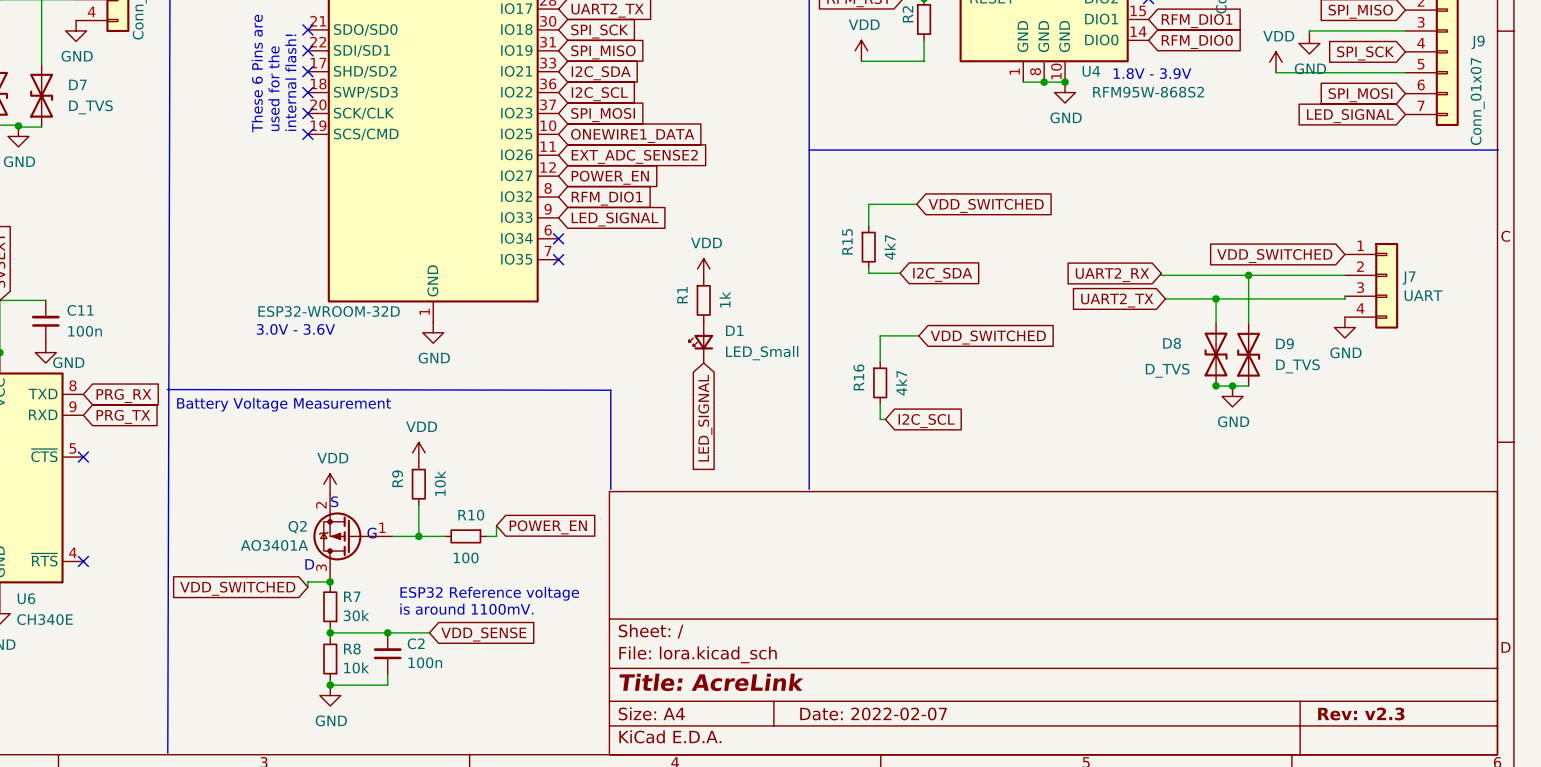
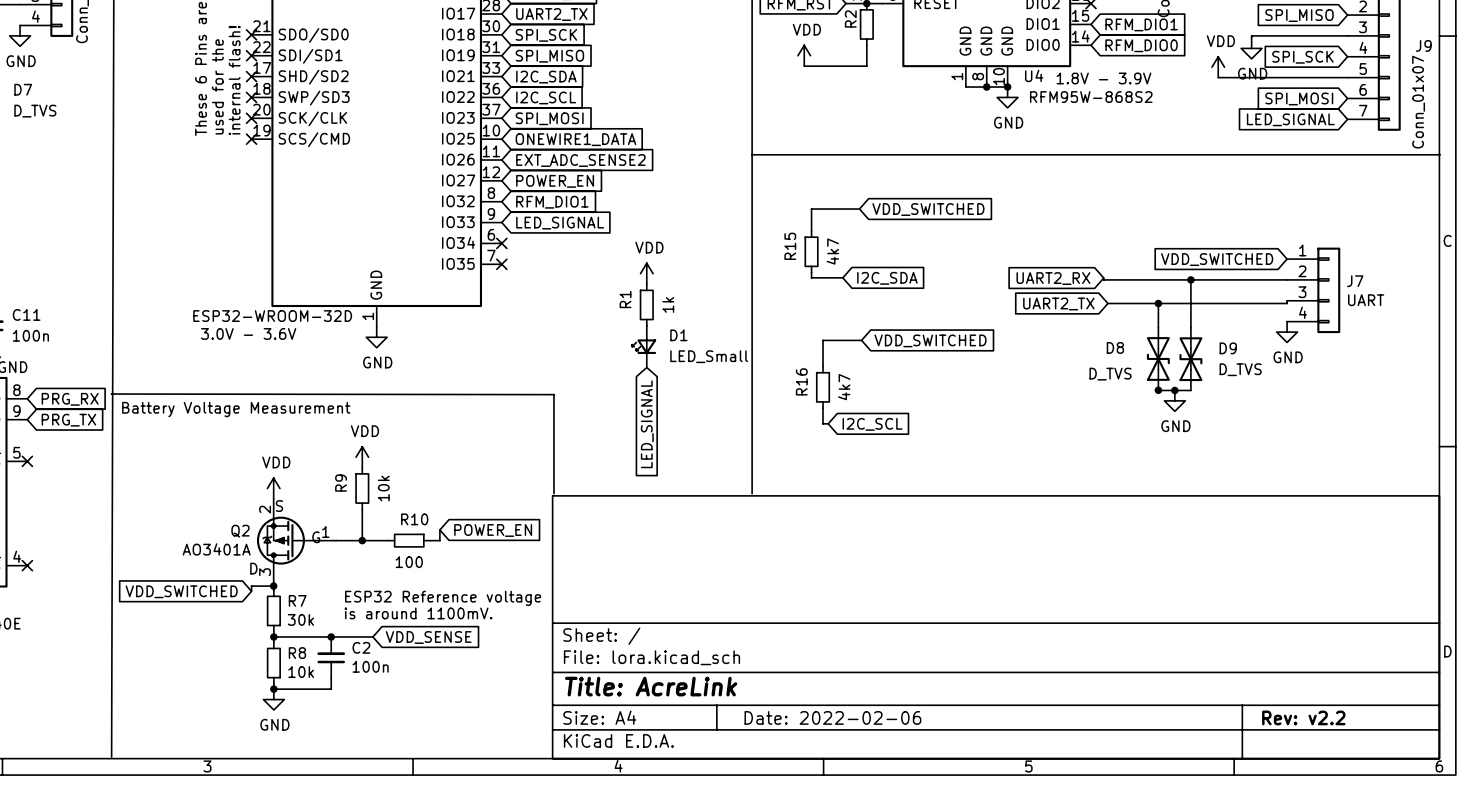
title block: Date: 2022-02-07 (873, 713) -> Date: 2022-02-06 (832, 717)
title block: Rev: v2.3 (1361, 713) -> Rev: v2.2 (1303, 717)

